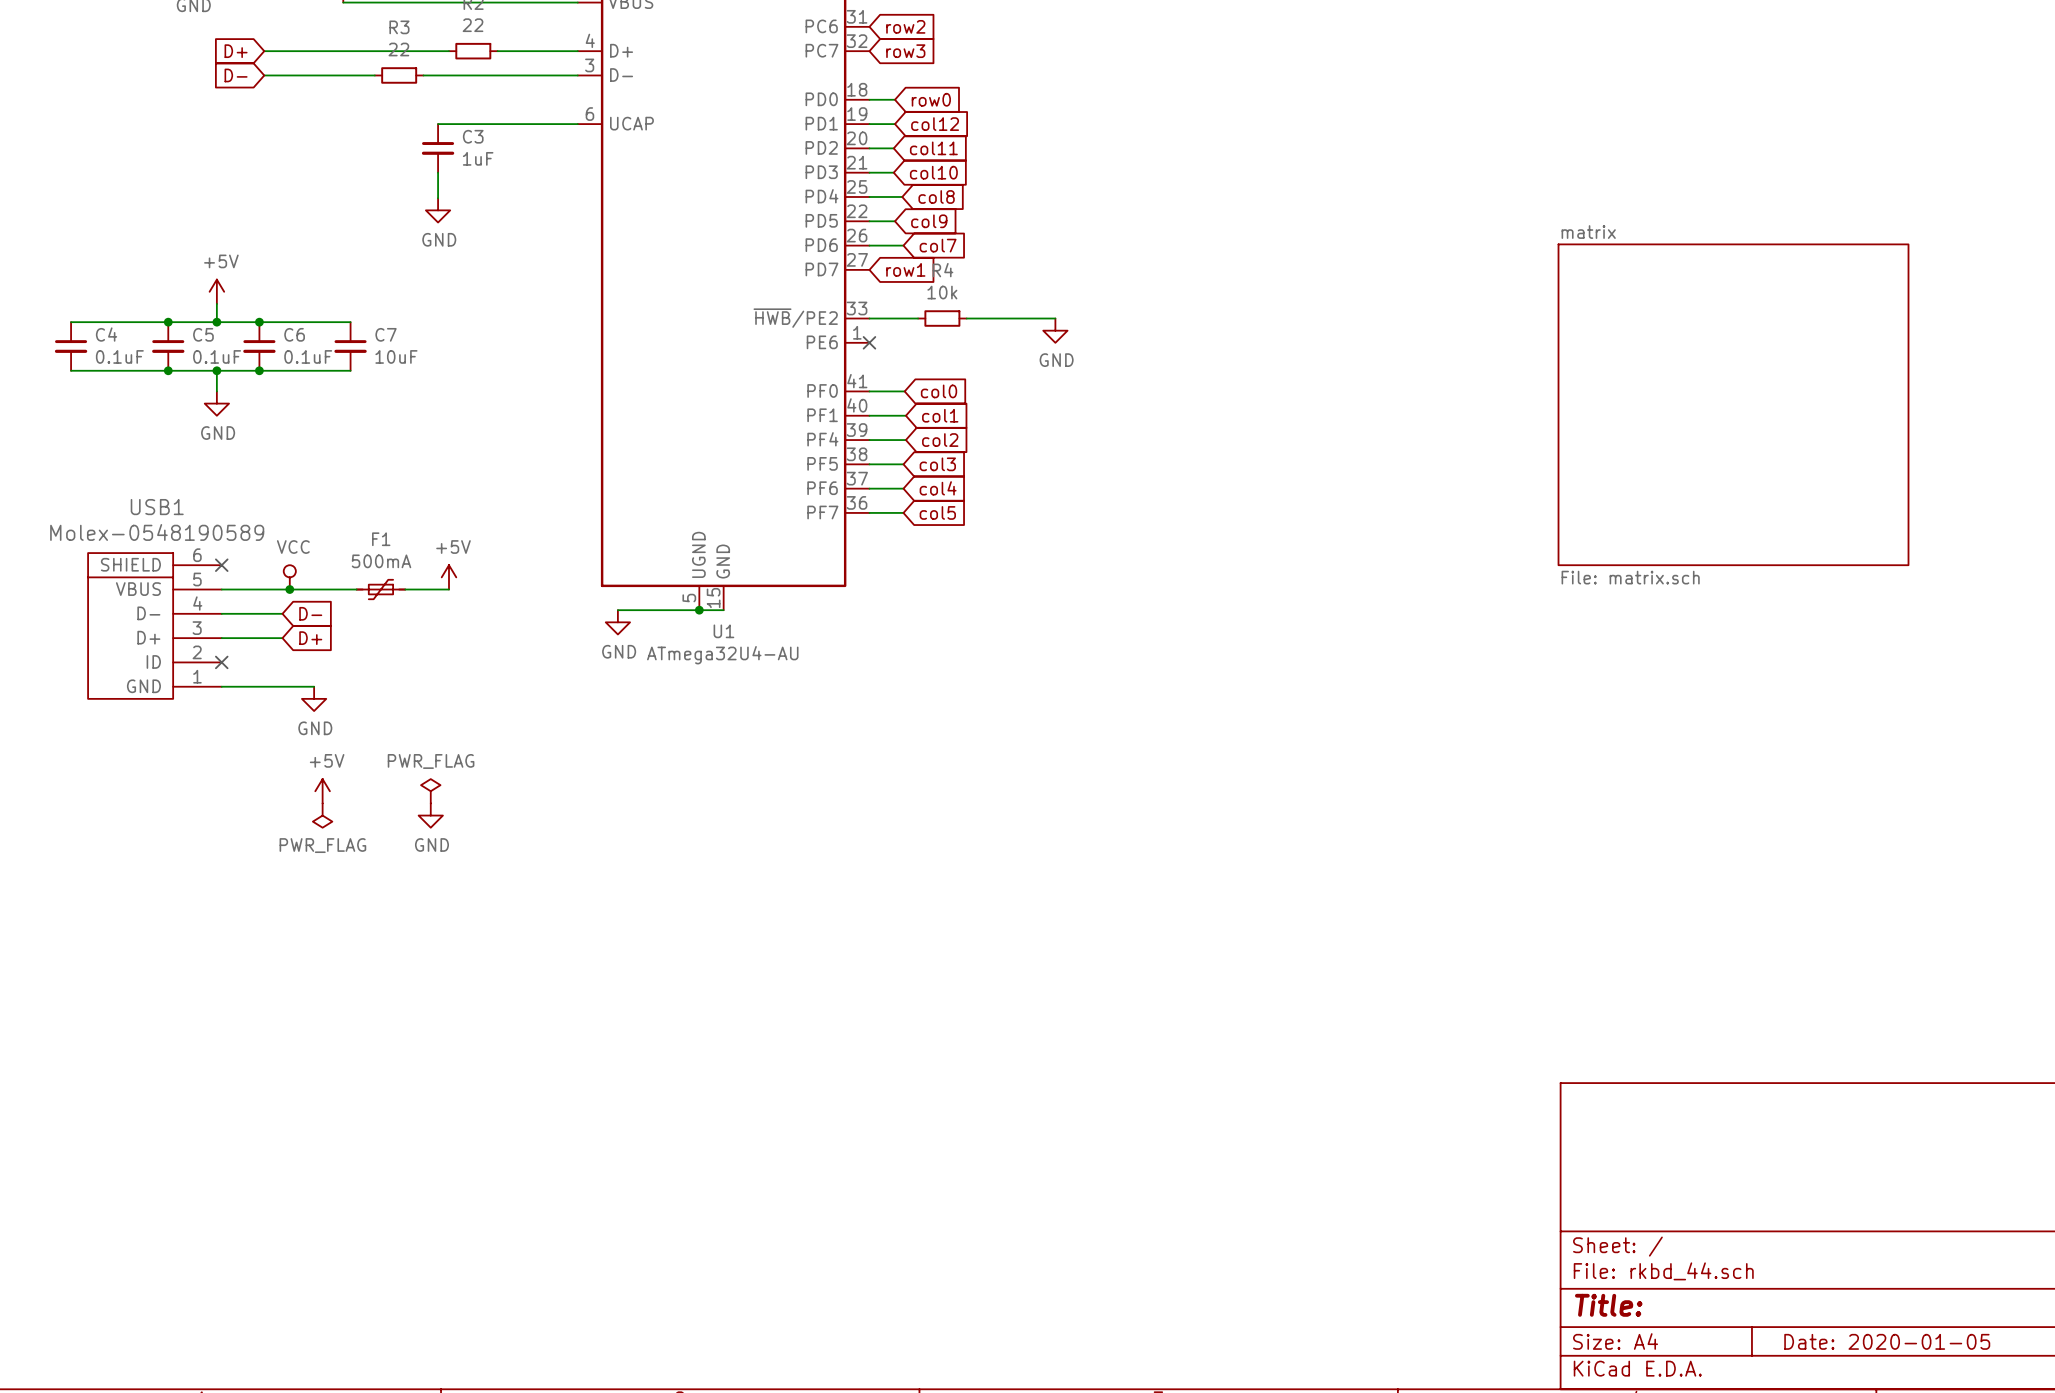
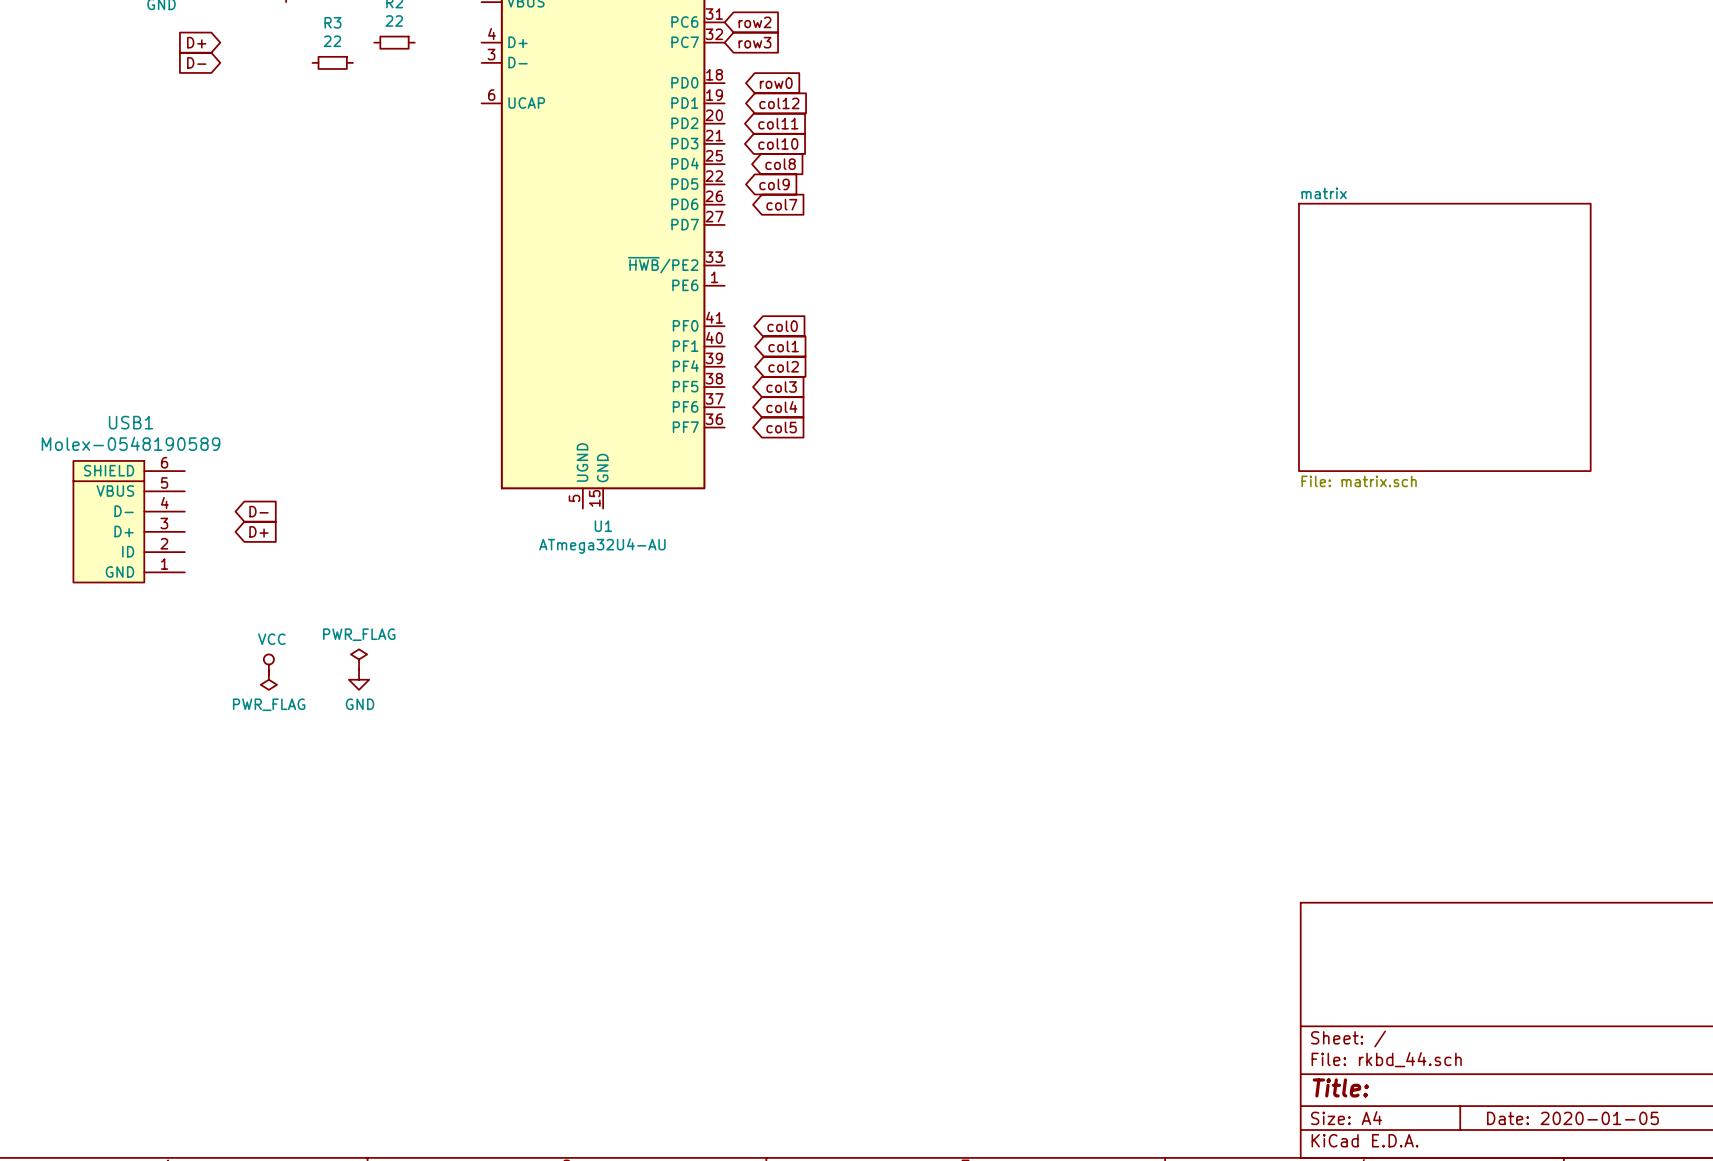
wire: (343, 2) (577, 2) -> none
wire: (264, 51) (449, 51) -> none
wire: (497, 51) (577, 51) -> none
wire: (264, 75) (374, 75) -> none
wire: (423, 75) (577, 75) -> none
wire: (869, 99) (894, 99) -> none
wire: (438, 124) (577, 124) -> none
wire: (869, 124) (894, 124) -> none
C3: 1uF (438, 148) -> none
wire: (869, 148) (893, 148) -> none
wire: (438, 172) (438, 198) -> none
wire: (869, 172) (893, 172) -> none
wire: (869, 196) (902, 196) -> none
power symbol: GND (438, 210) -> none
wire: (869, 221) (894, 221) -> none
wire: (869, 245) (903, 245) -> none
global label: row1 (905, 269) -> none
power symbol: +5V (216, 291) -> none
wire: (216, 303) (216, 322) -> none
wire: (869, 318) (918, 318) -> none
R4: 10k (942, 318) -> none
wire: (966, 318) (1055, 318) -> none
wire: (71, 322) (350, 322) -> none
junction: (168, 322) -> none
junction: (216, 322) -> none
junction: (259, 322) -> none
power symbol: GND (1055, 330) -> none
no-connect mark: (869, 342) -> none
C4: 0.1uF (71, 346) -> none
C5: 0.1uF (168, 346) -> none
C6: 0.1uF (259, 346) -> none
C7: 10uF (350, 346) -> none
wire: (71, 370) (350, 370) -> none
junction: (168, 370) -> none
wire: (216, 370) (216, 391) -> none
junction: (216, 370) -> none
junction: (259, 370) -> none
wire: (869, 391) (904, 391) -> none
power symbol: GND (216, 403) -> none
wire: (869, 415) (905, 415) -> none
wire: (869, 440) (905, 440) -> none
wire: (869, 464) (903, 464) -> none
wire: (869, 488) (903, 488) -> none
wire: (869, 512) (903, 512) -> none
no-connect mark: (221, 565) -> none
power symbol: VCC (289, 577) -> none
power symbol: +5V (449, 577) -> none
wire: (221, 589) (356, 589) -> none
junction: (289, 589) -> none
F1: 500mA (380, 589) -> none
wire: (405, 589) (449, 589) -> none
wire: (617, 610) (723, 610) -> none
junction: (699, 610) -> none
wire: (221, 613) (282, 613) -> none
power symbol: GND (617, 622) -> none
wire: (221, 638) (282, 638) -> none
no-connect mark: (221, 662) -> none
wire: (221, 686) (314, 686) -> none
power symbol: GND (314, 698) -> none
power symbol: +5V (322, 791) -> VCC (268, 664)

